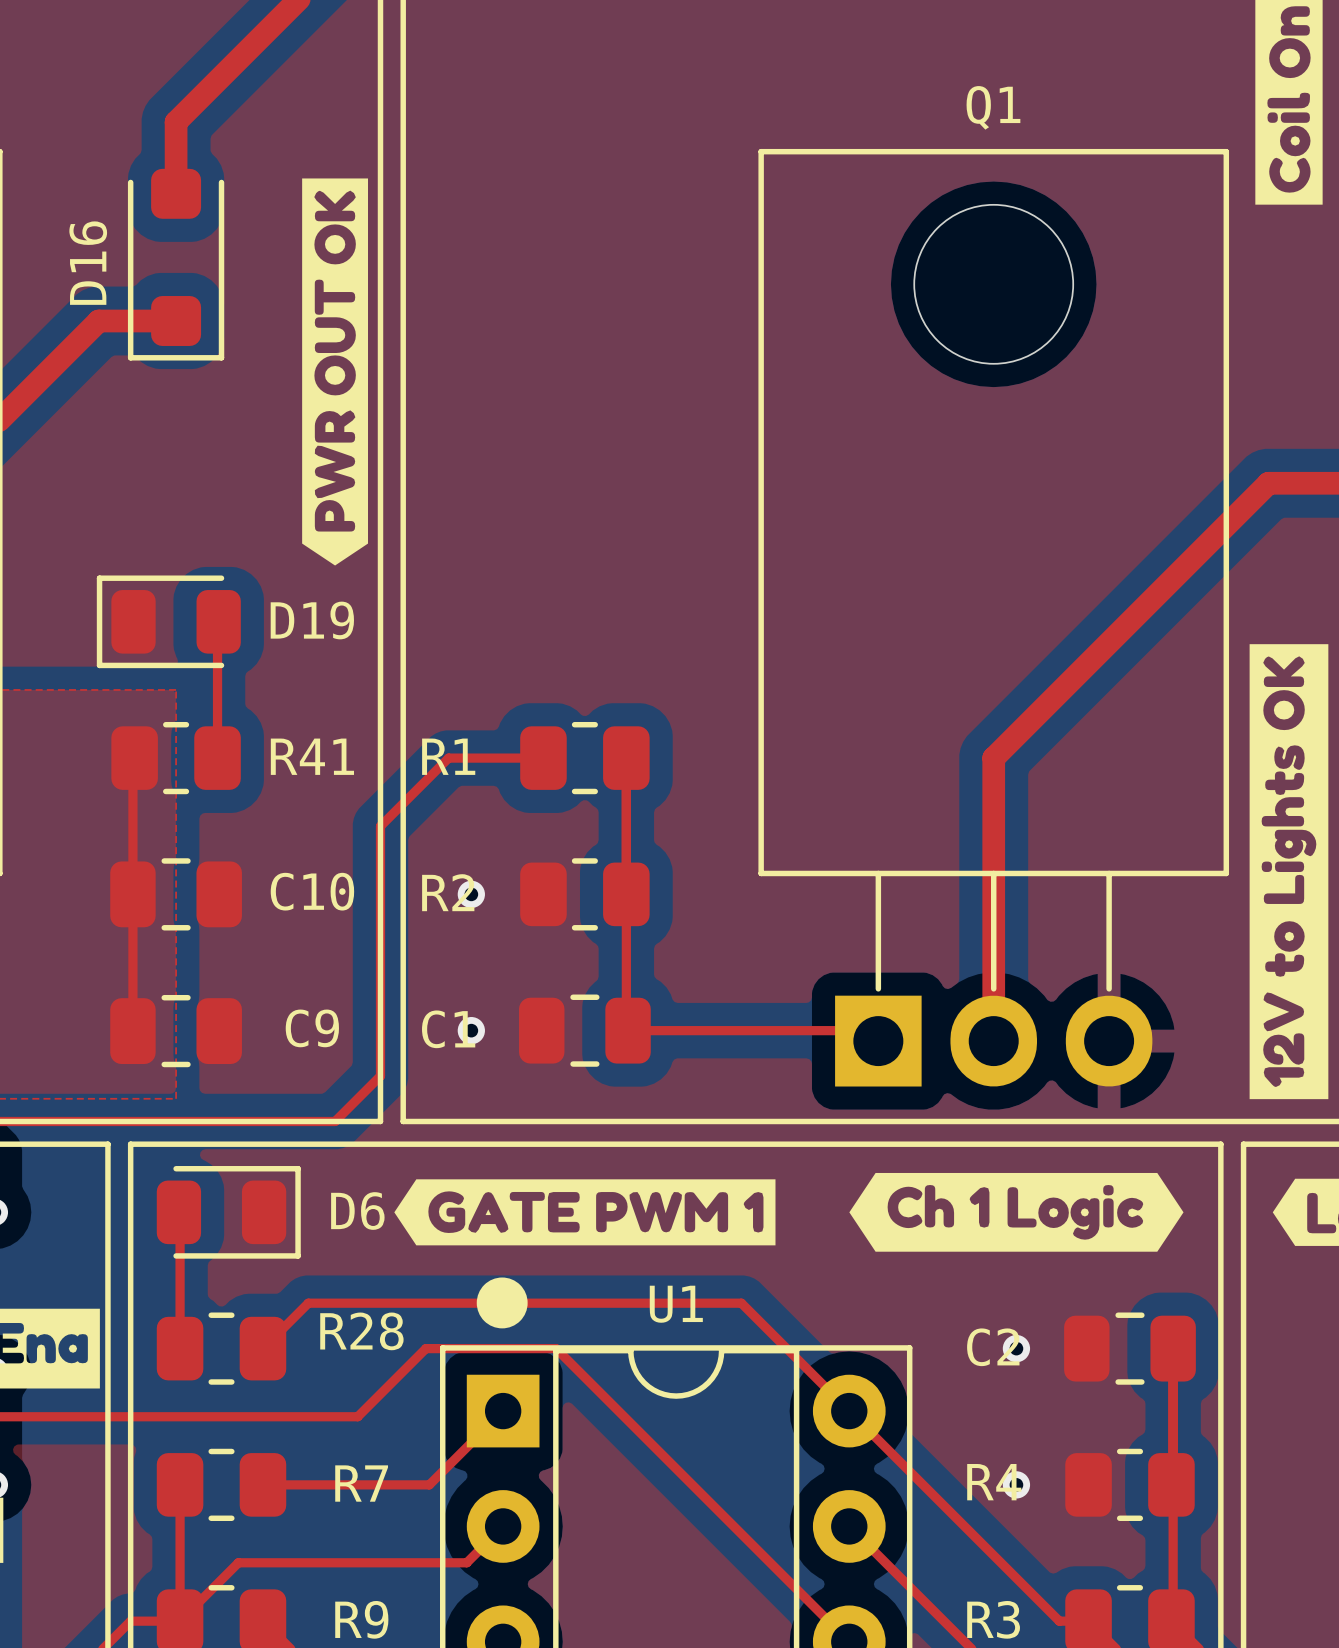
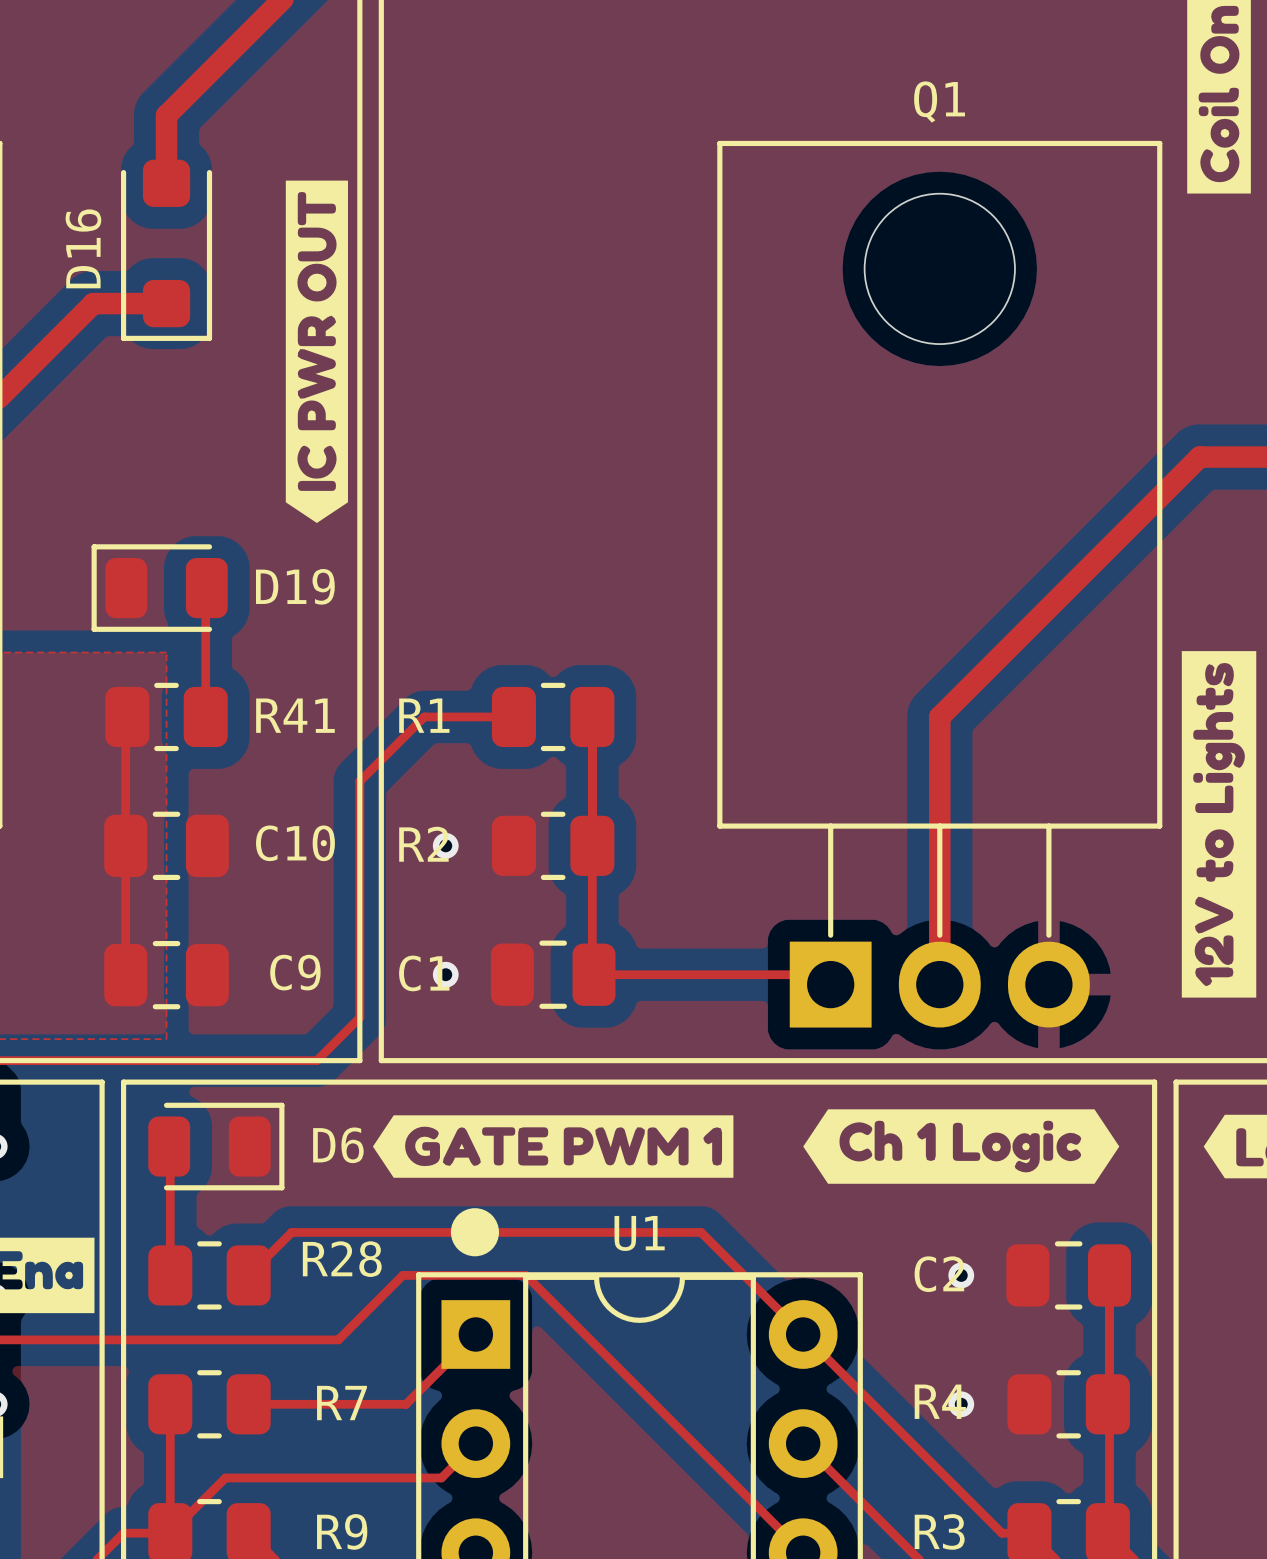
drawing shape: [302, 178, 369, 566] -> [285, 180, 348, 524]
drawing shape: [1249, 644, 1329, 1100] -> [1181, 651, 1257, 998]

